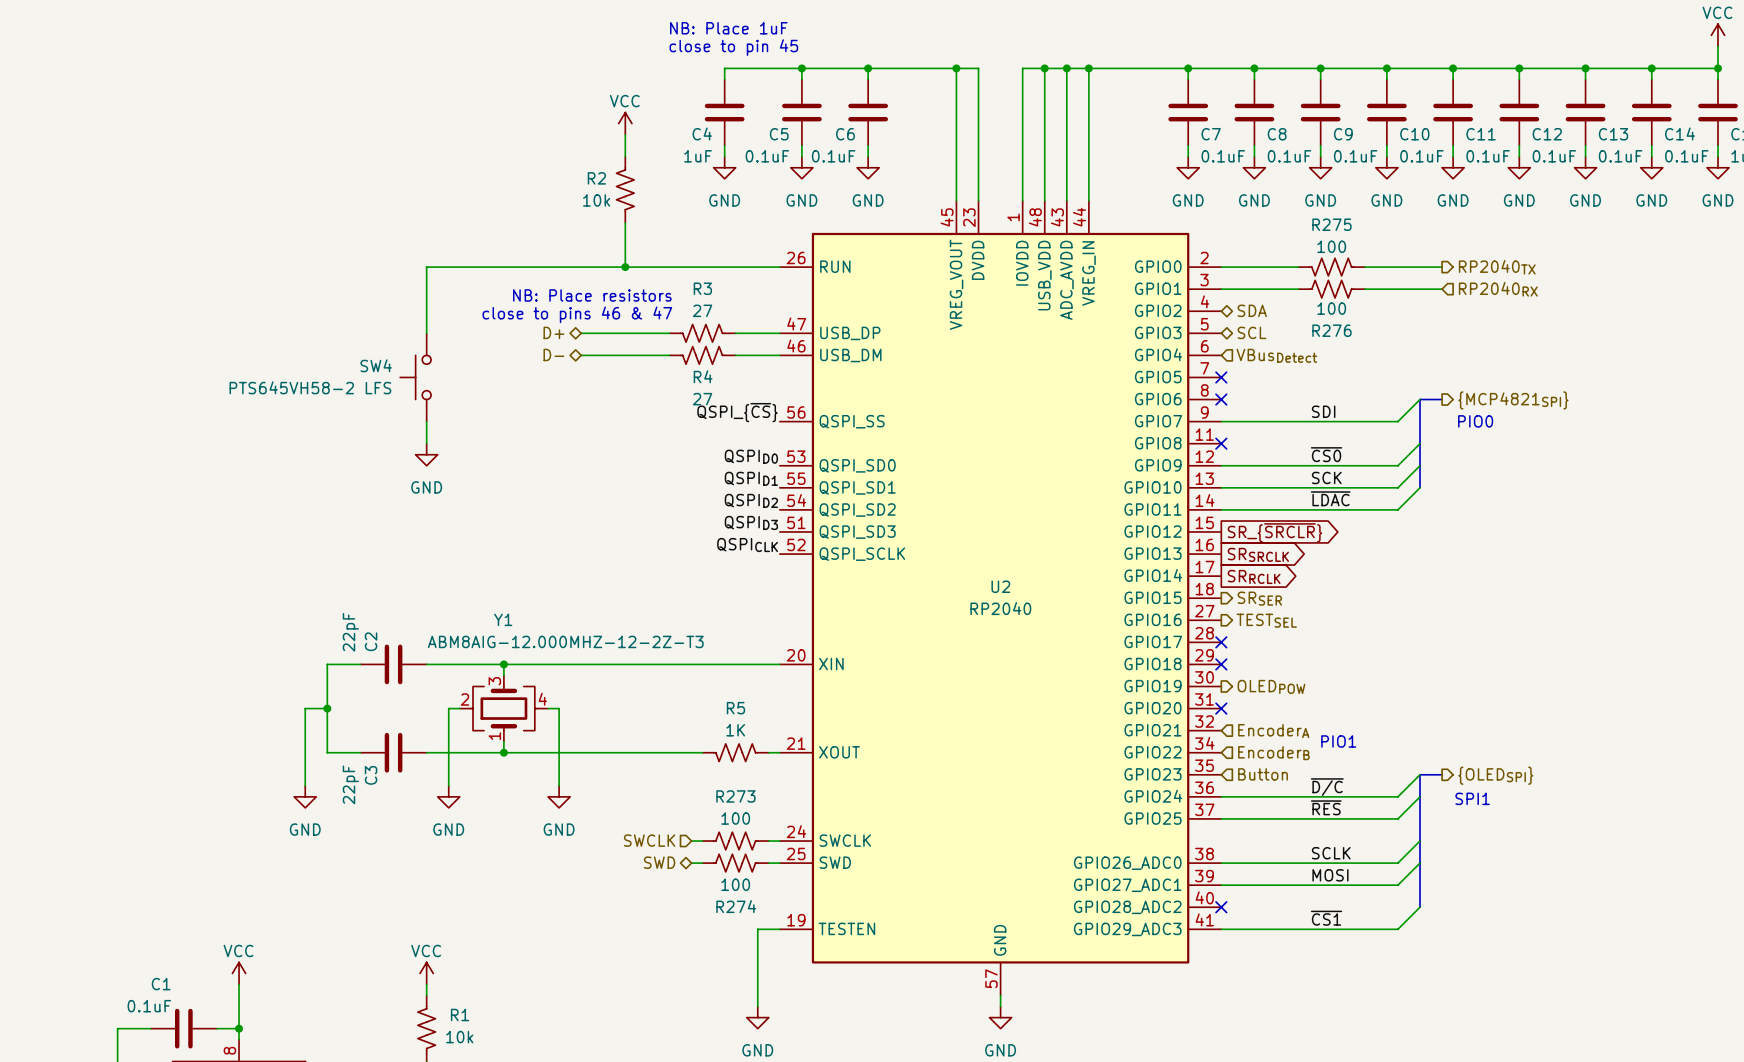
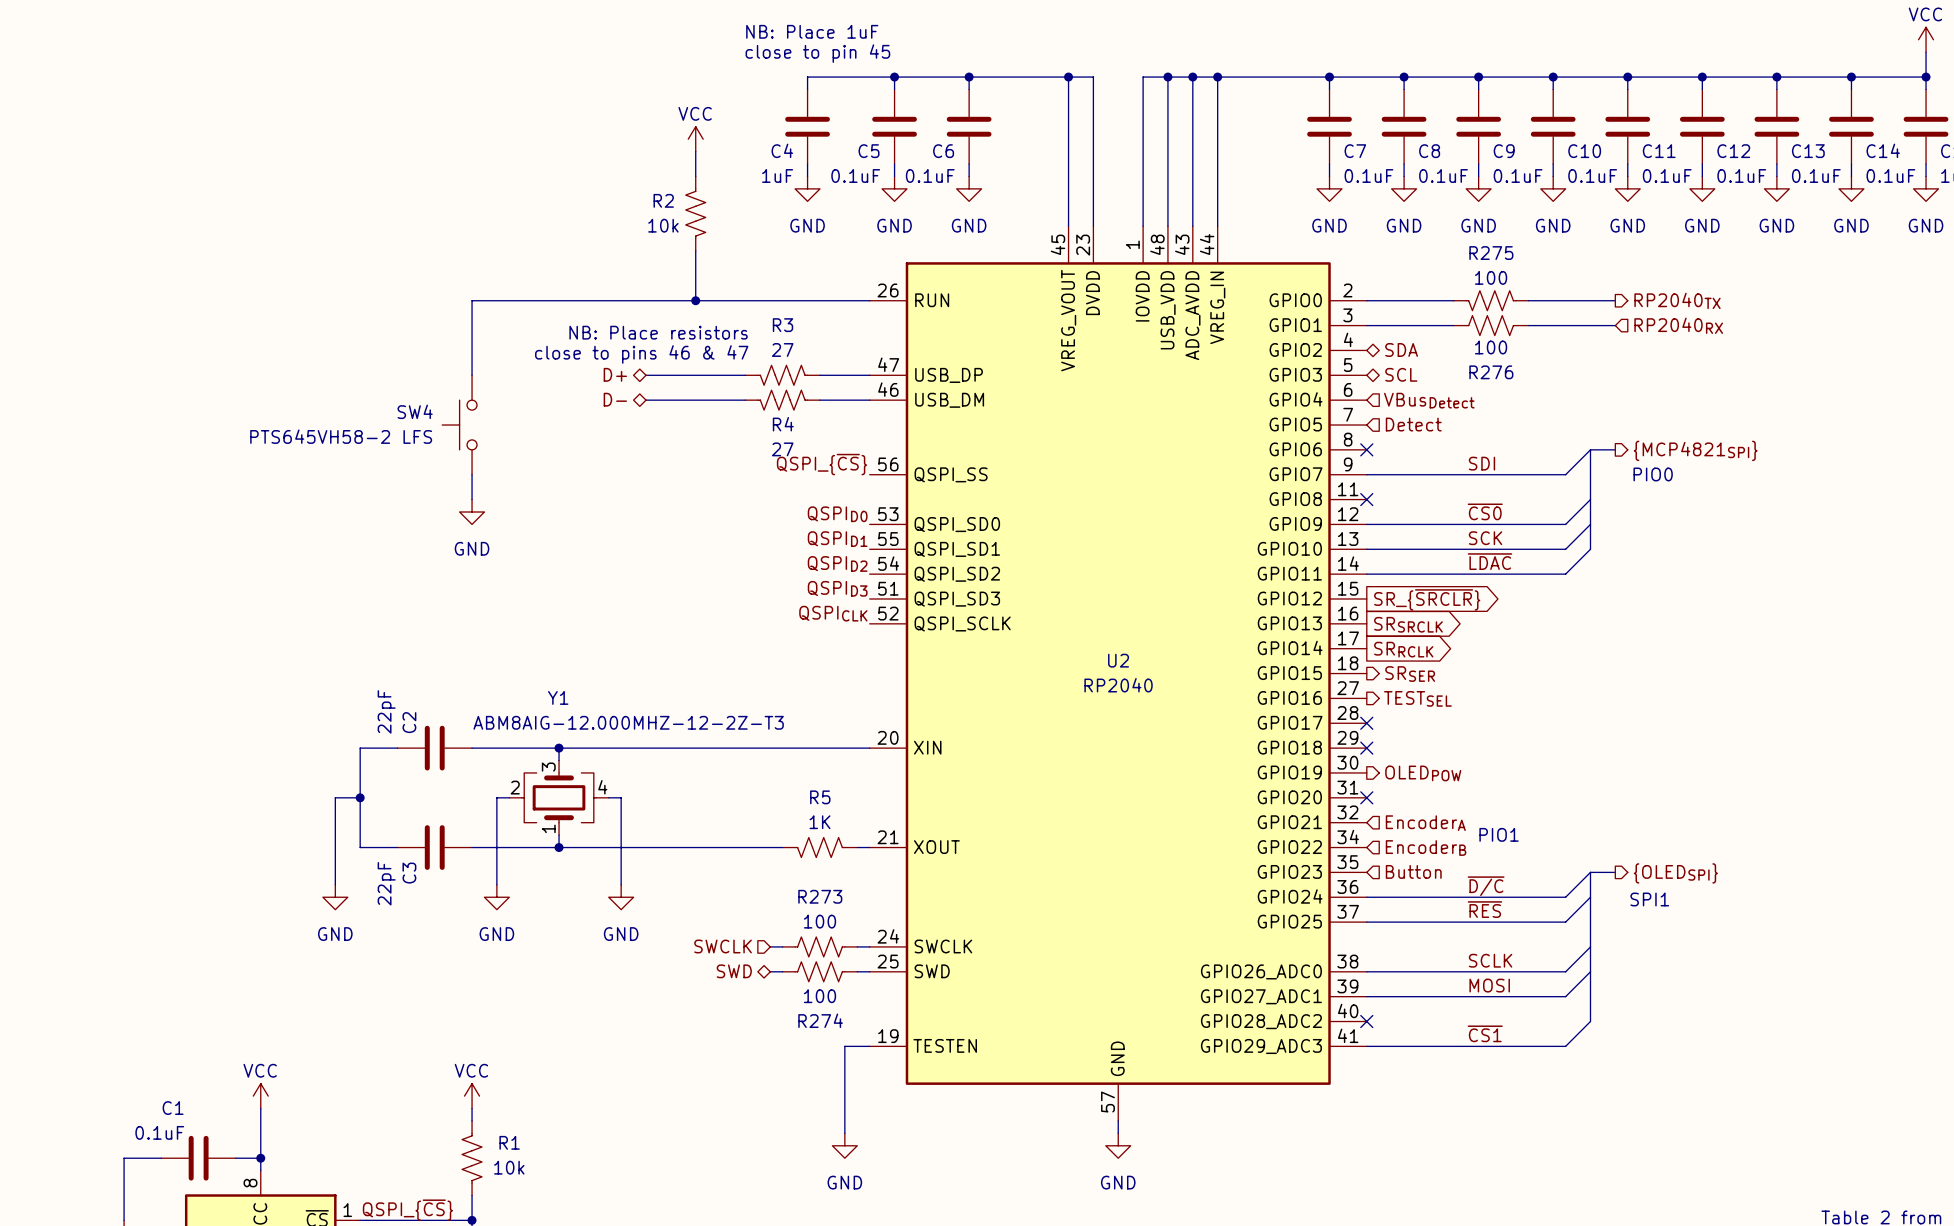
no-connect mark: (1221, 377) -> none
hierarchical label: none -> Detect (1413, 424)

